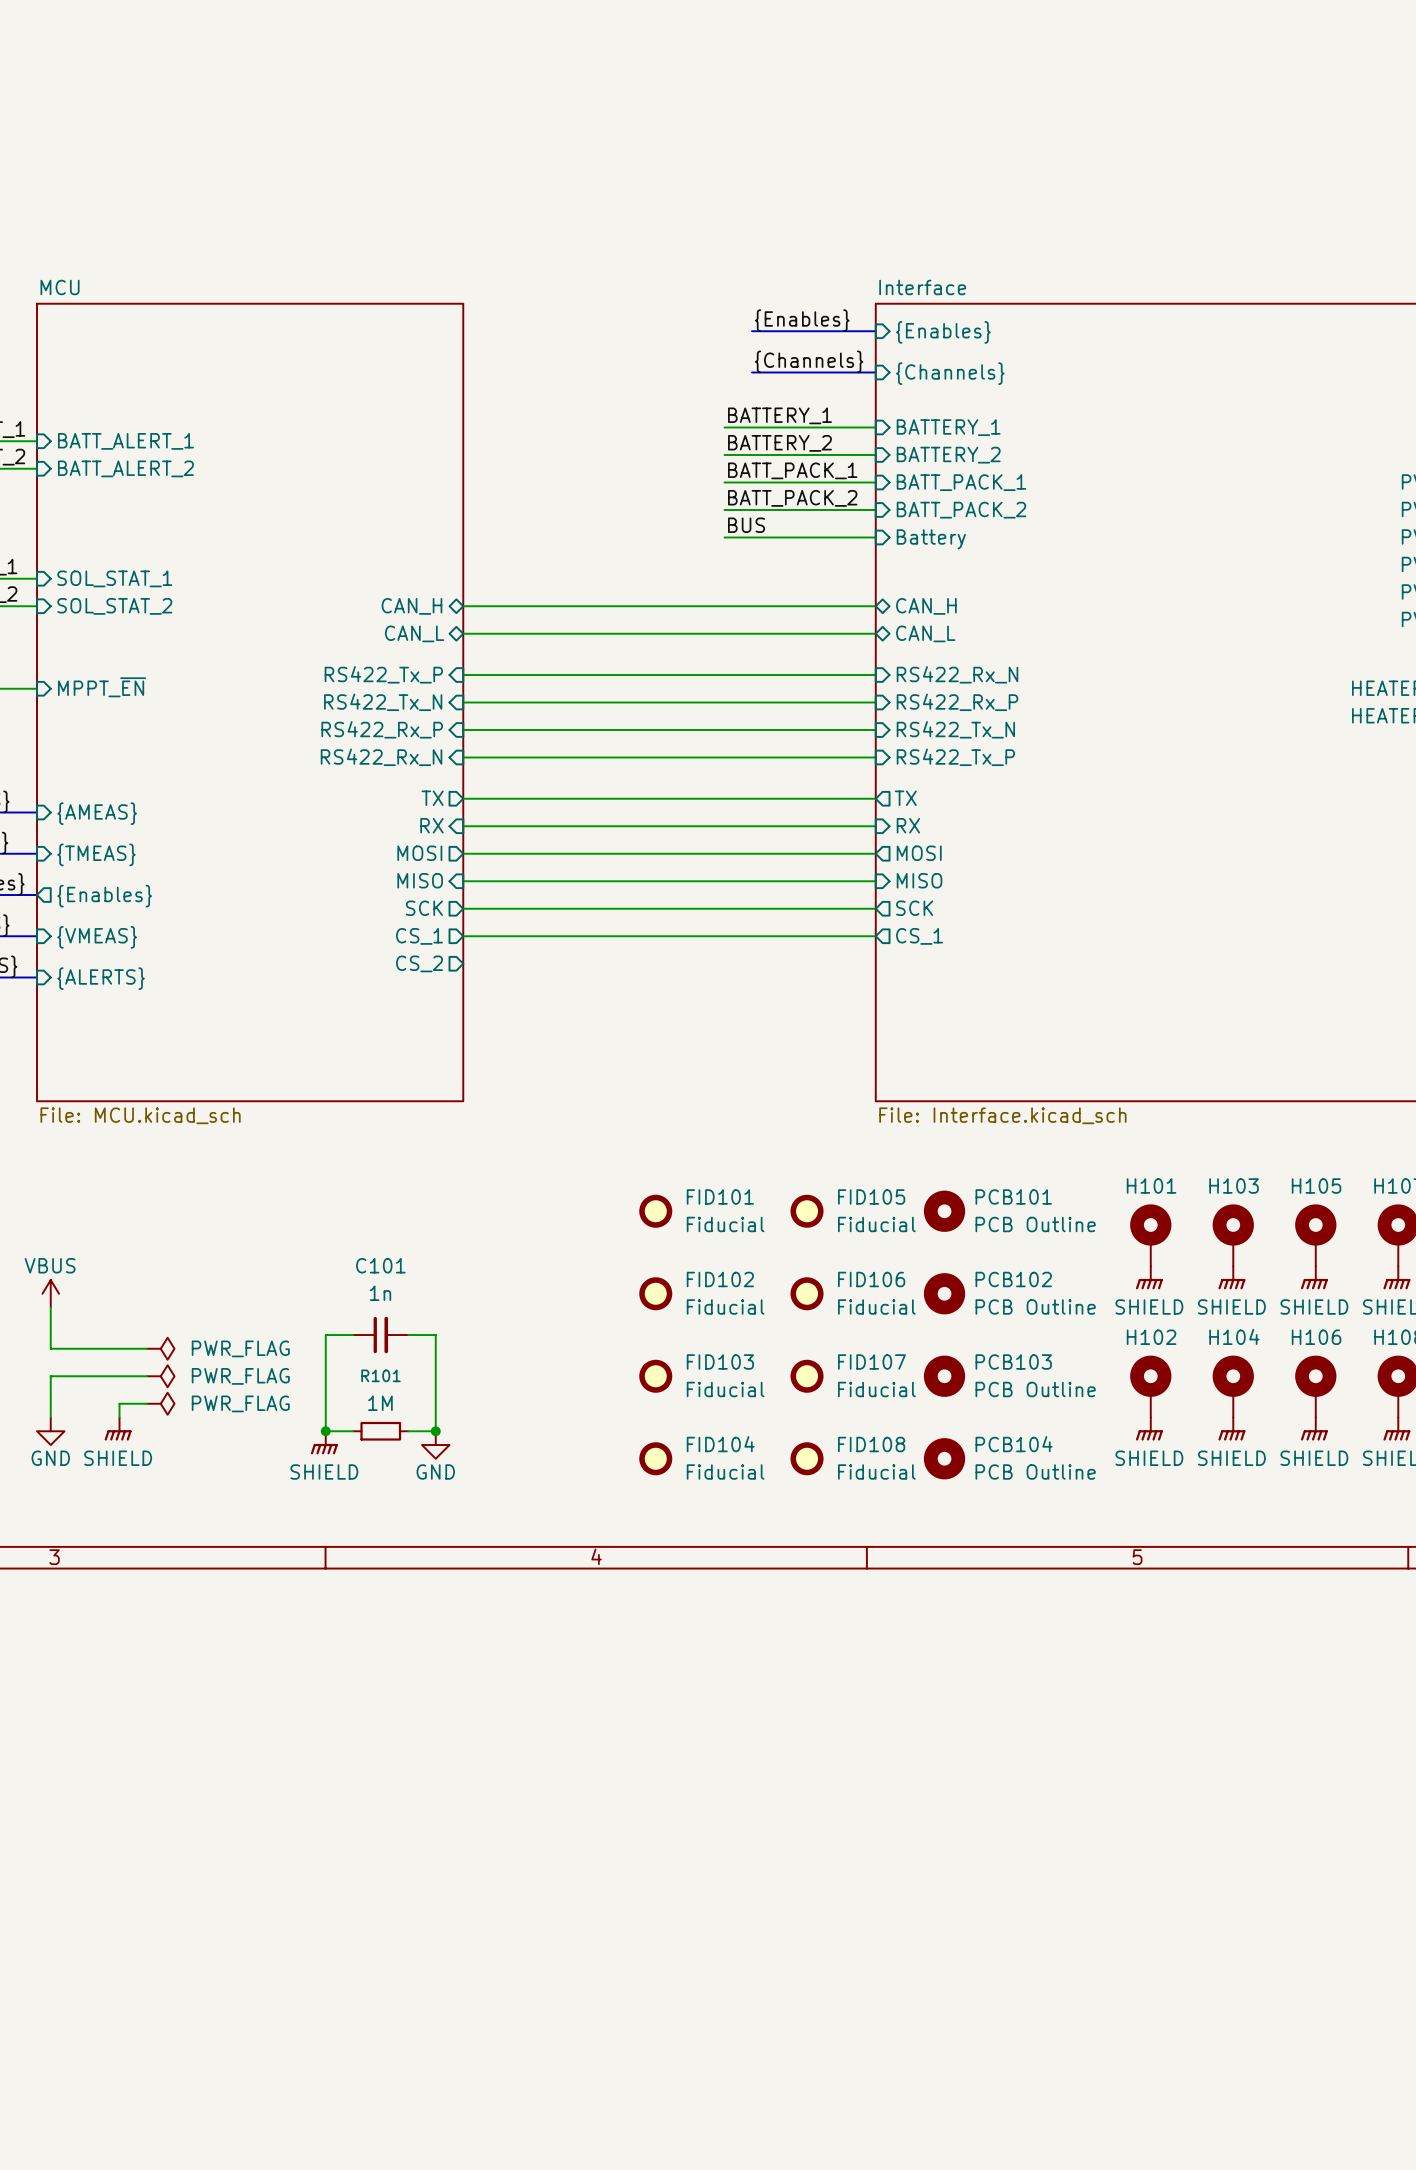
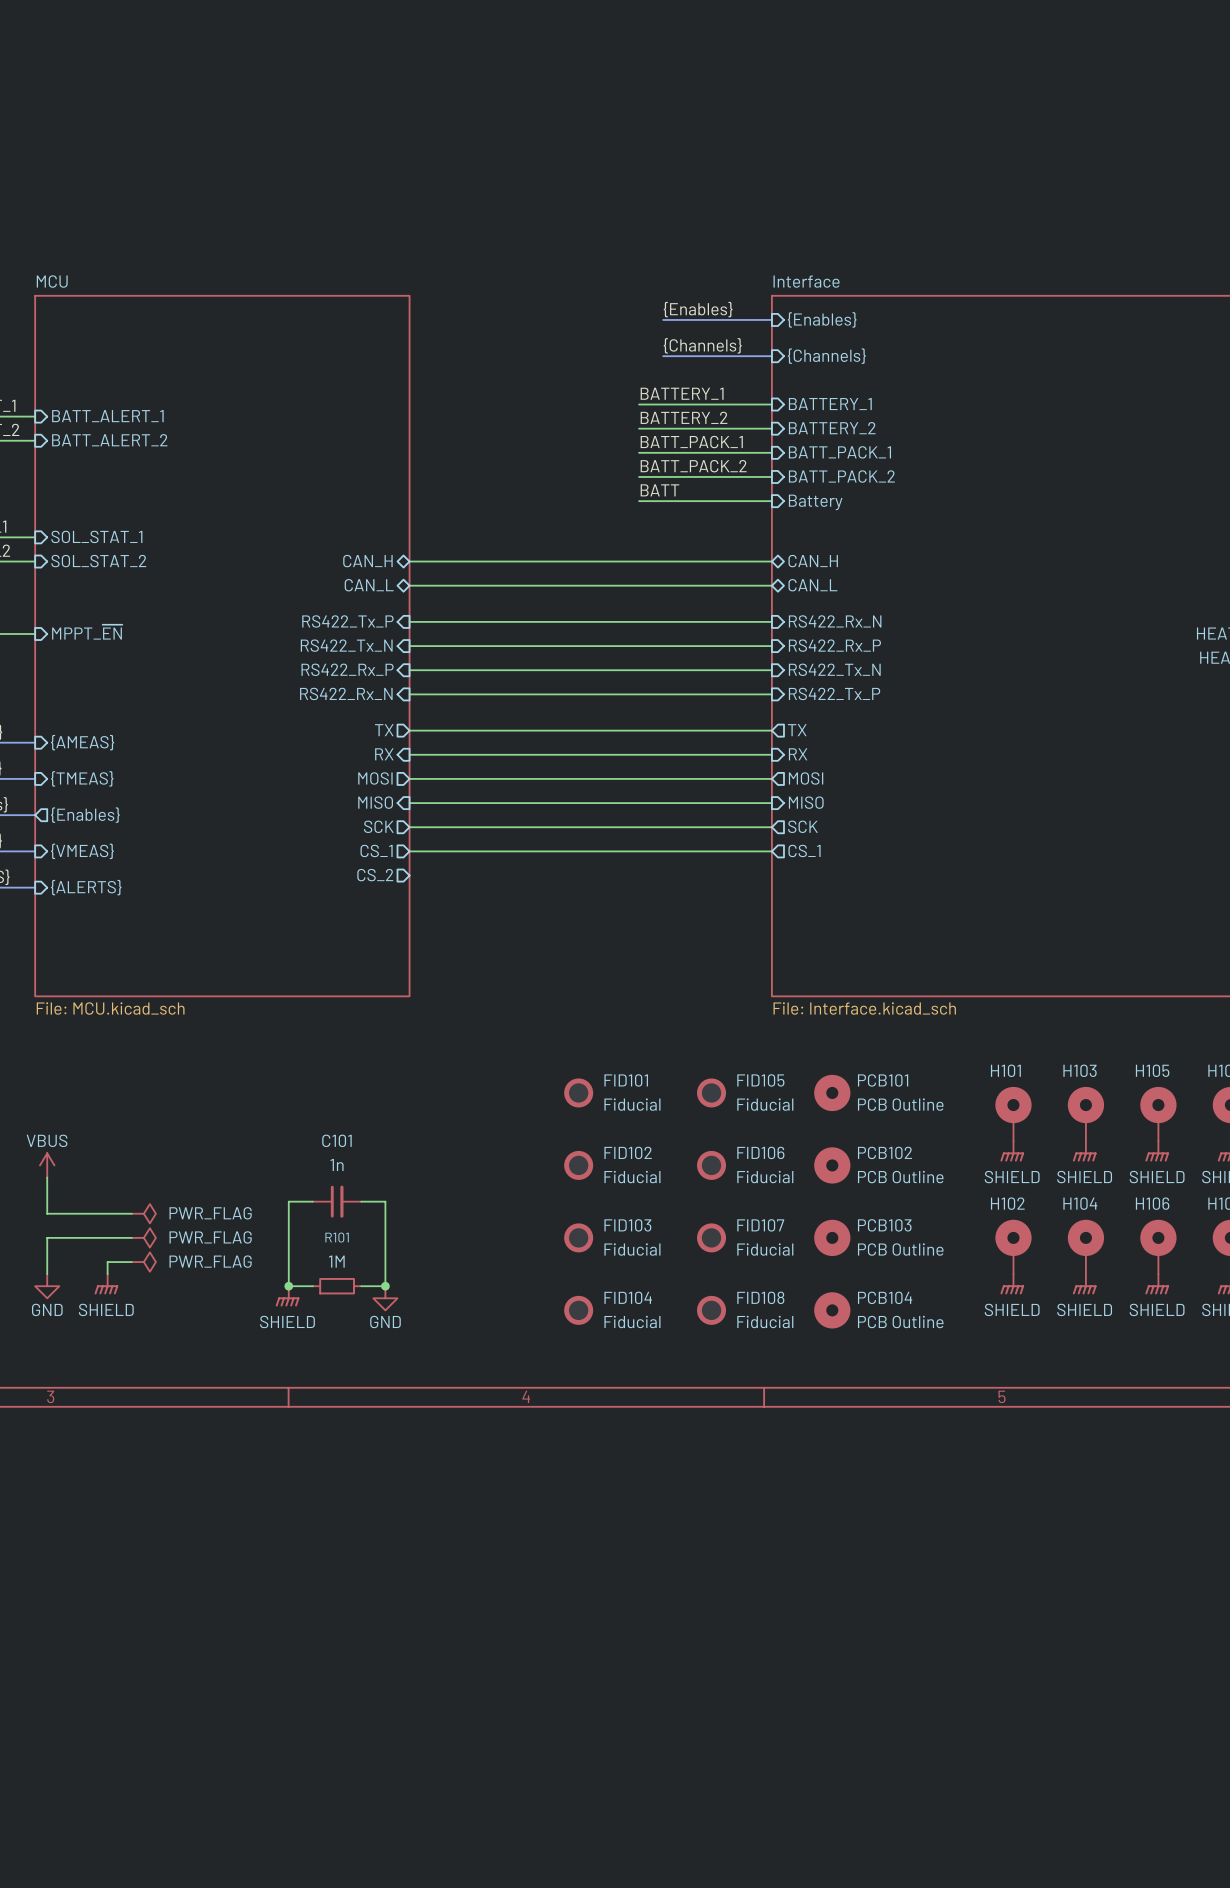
label: BUS (746, 525) -> BATT (659, 490)

